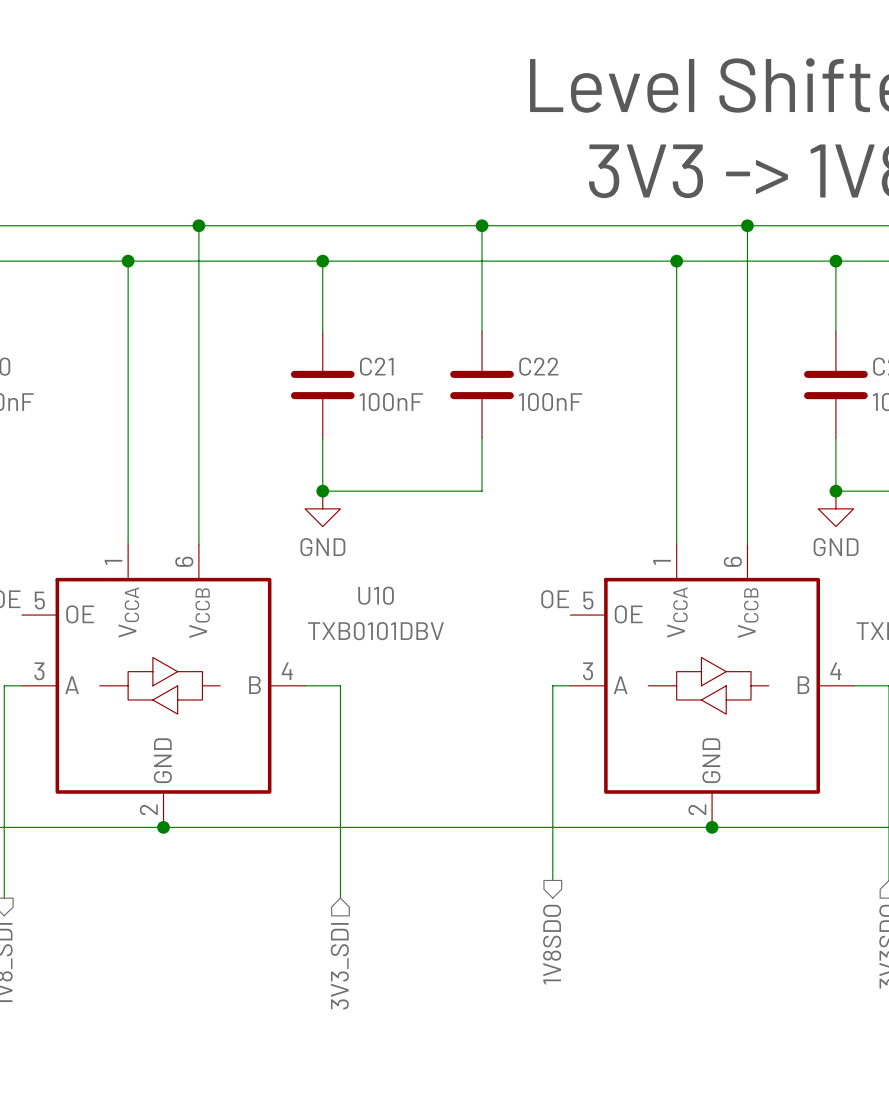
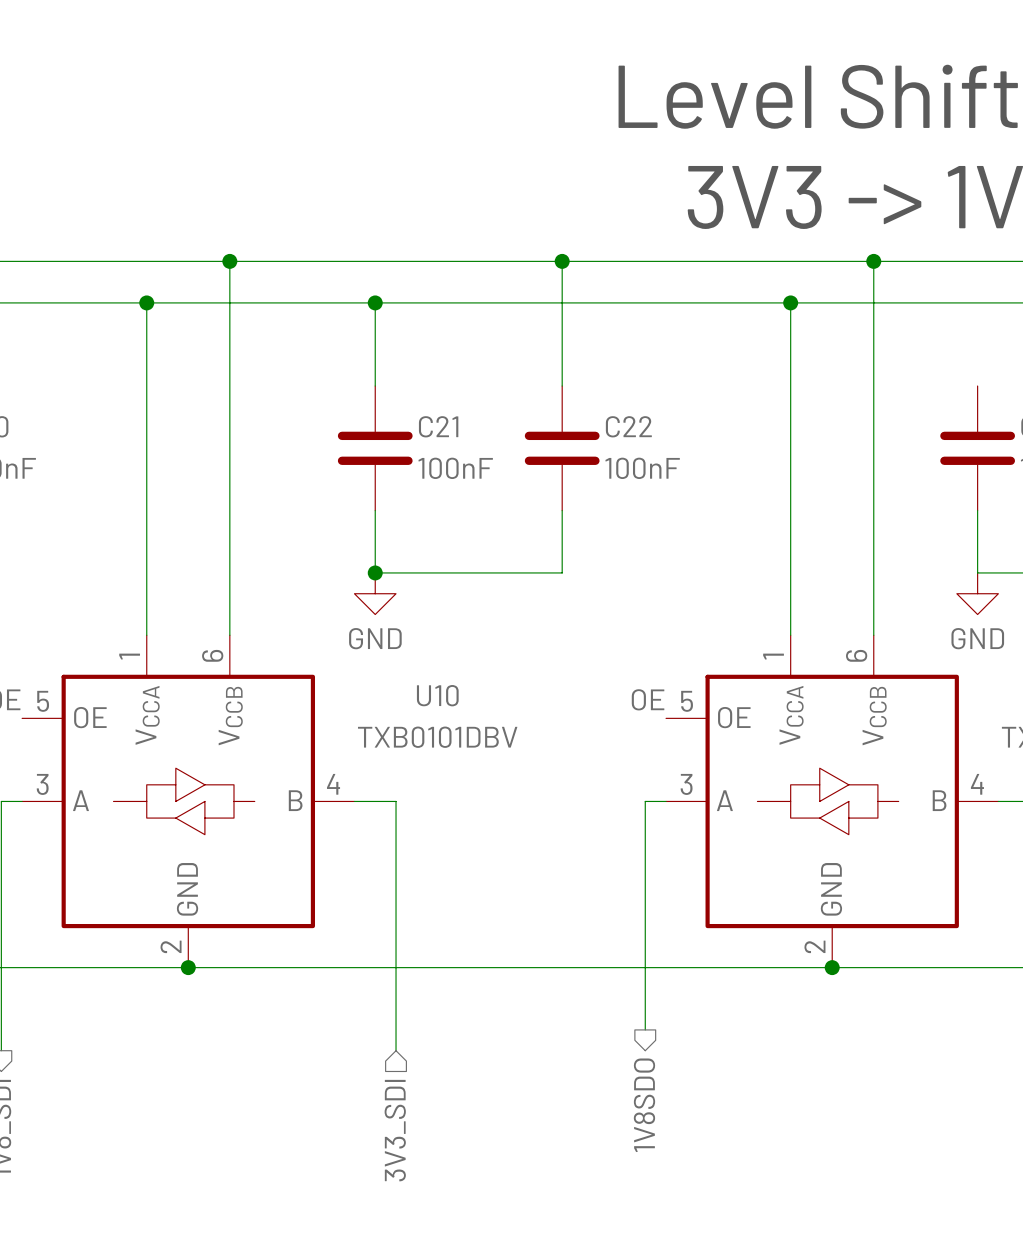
wire: (835, 261) (835, 331) -> none
junction: (835, 261) -> none
junction: (835, 491) -> none

